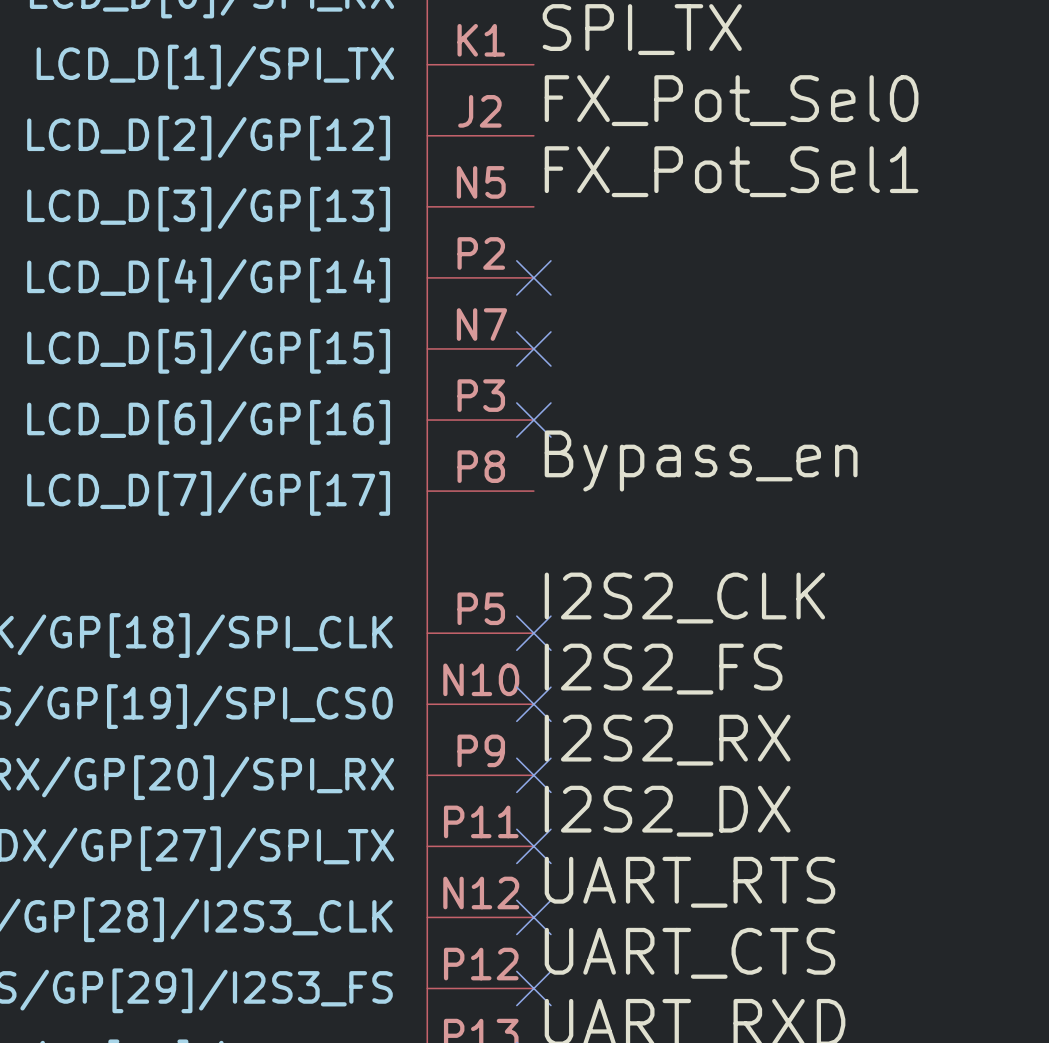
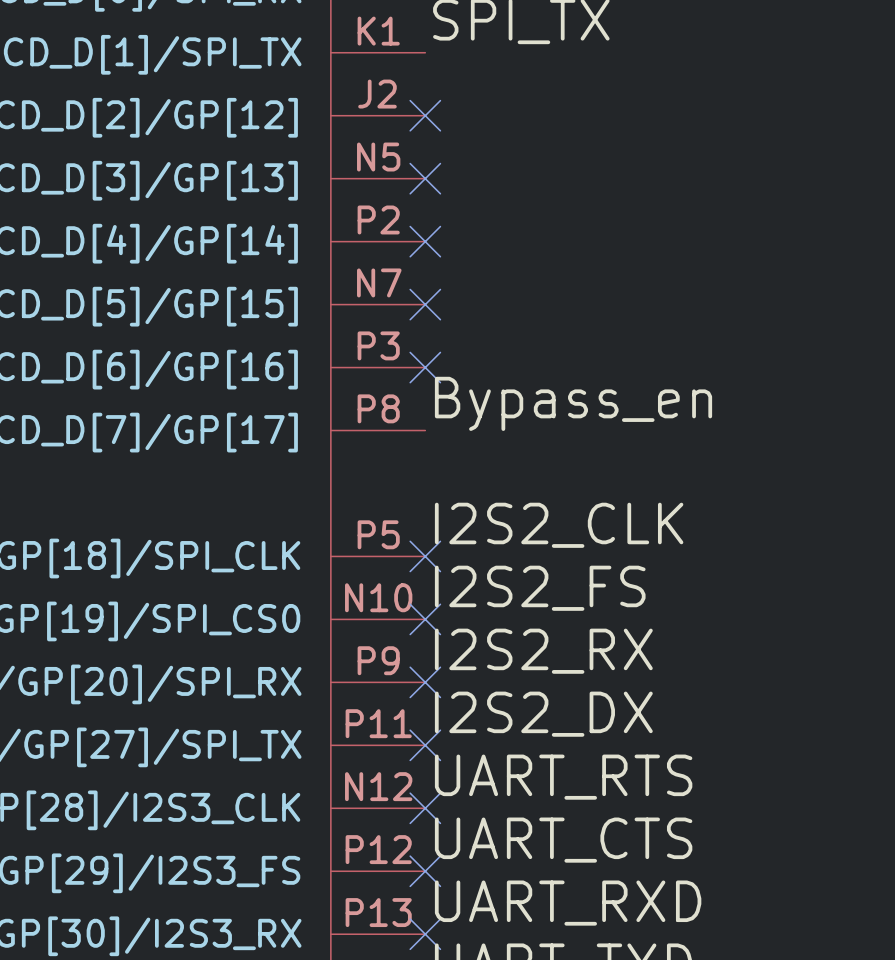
label: FX_Pot_Sel0 (731, 100) -> none
no-connect mark: none -> (425, 115)
label: FX_Pot_Sel1 (731, 171) -> none
no-connect mark: none -> (425, 178)

